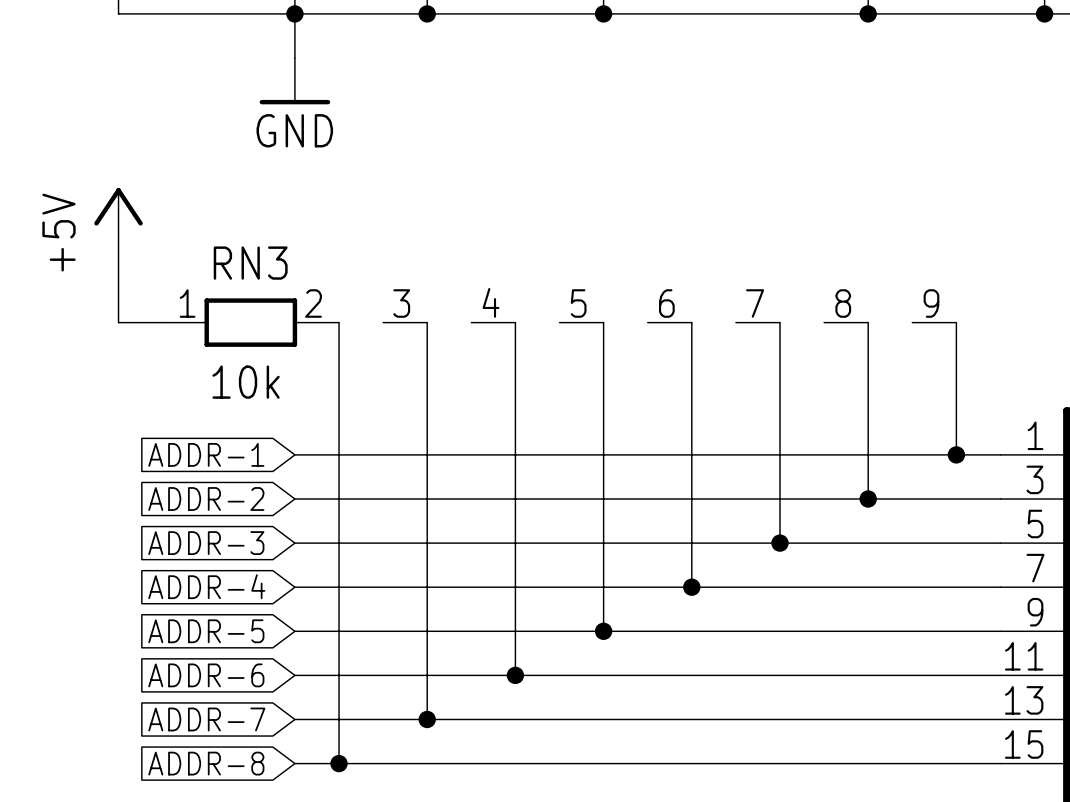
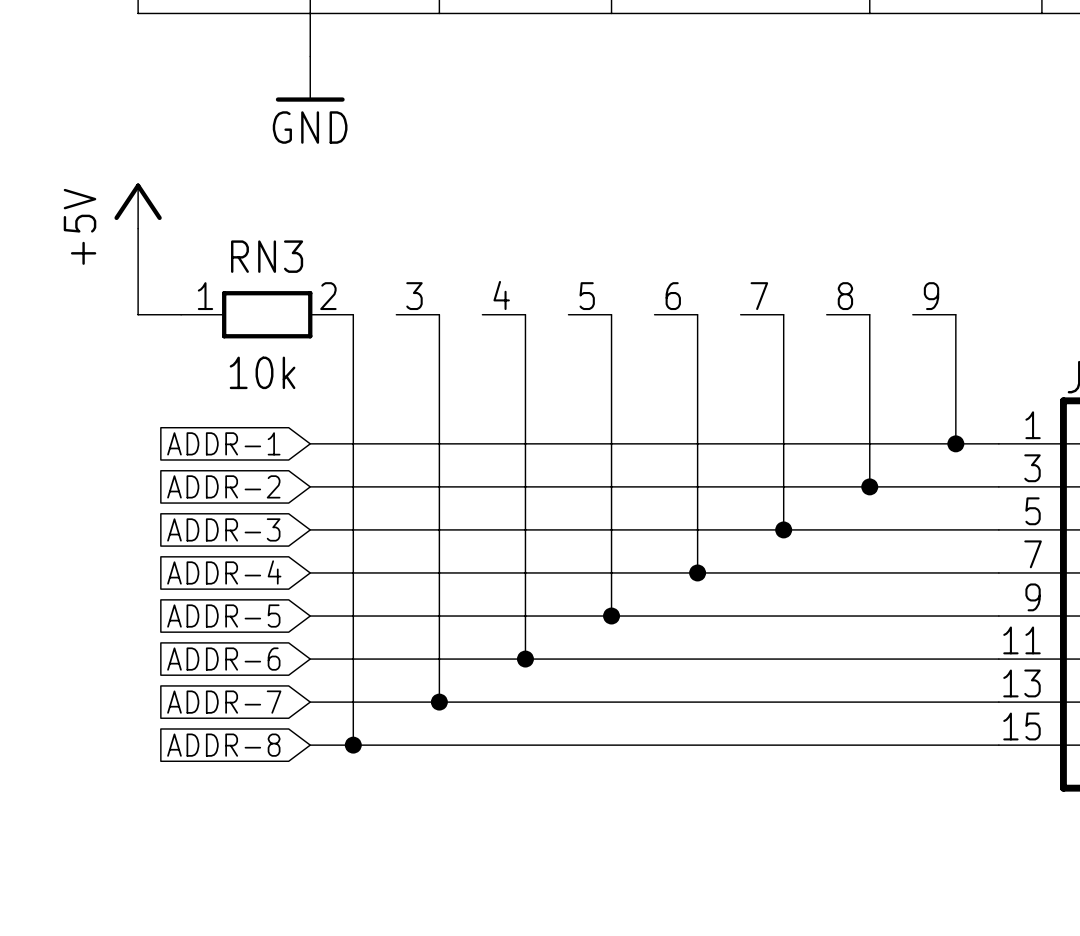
junction: (294, 13) -> none
junction: (427, 13) -> none
junction: (603, 13) -> none
junction: (868, 13) -> none
junction: (1044, 13) -> none

